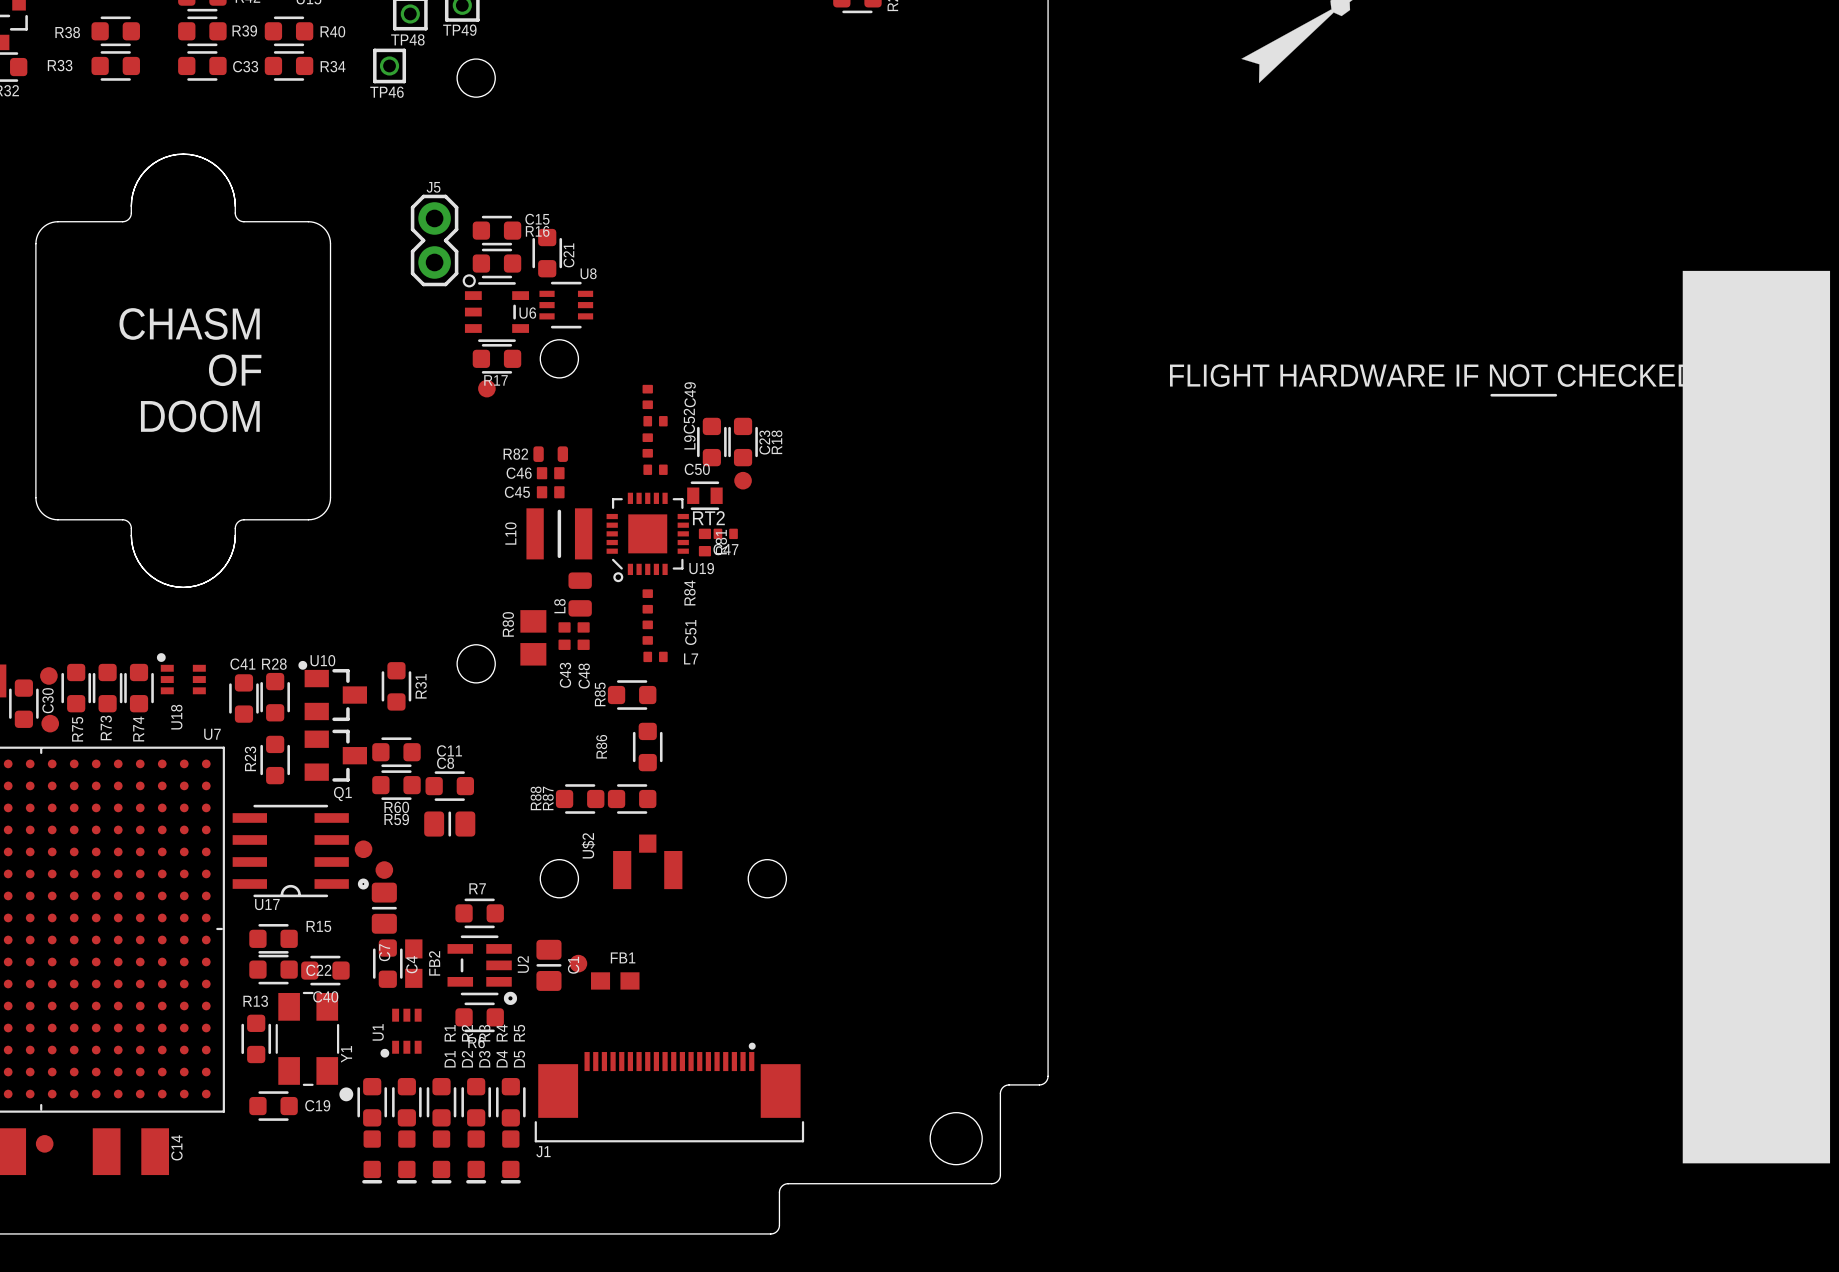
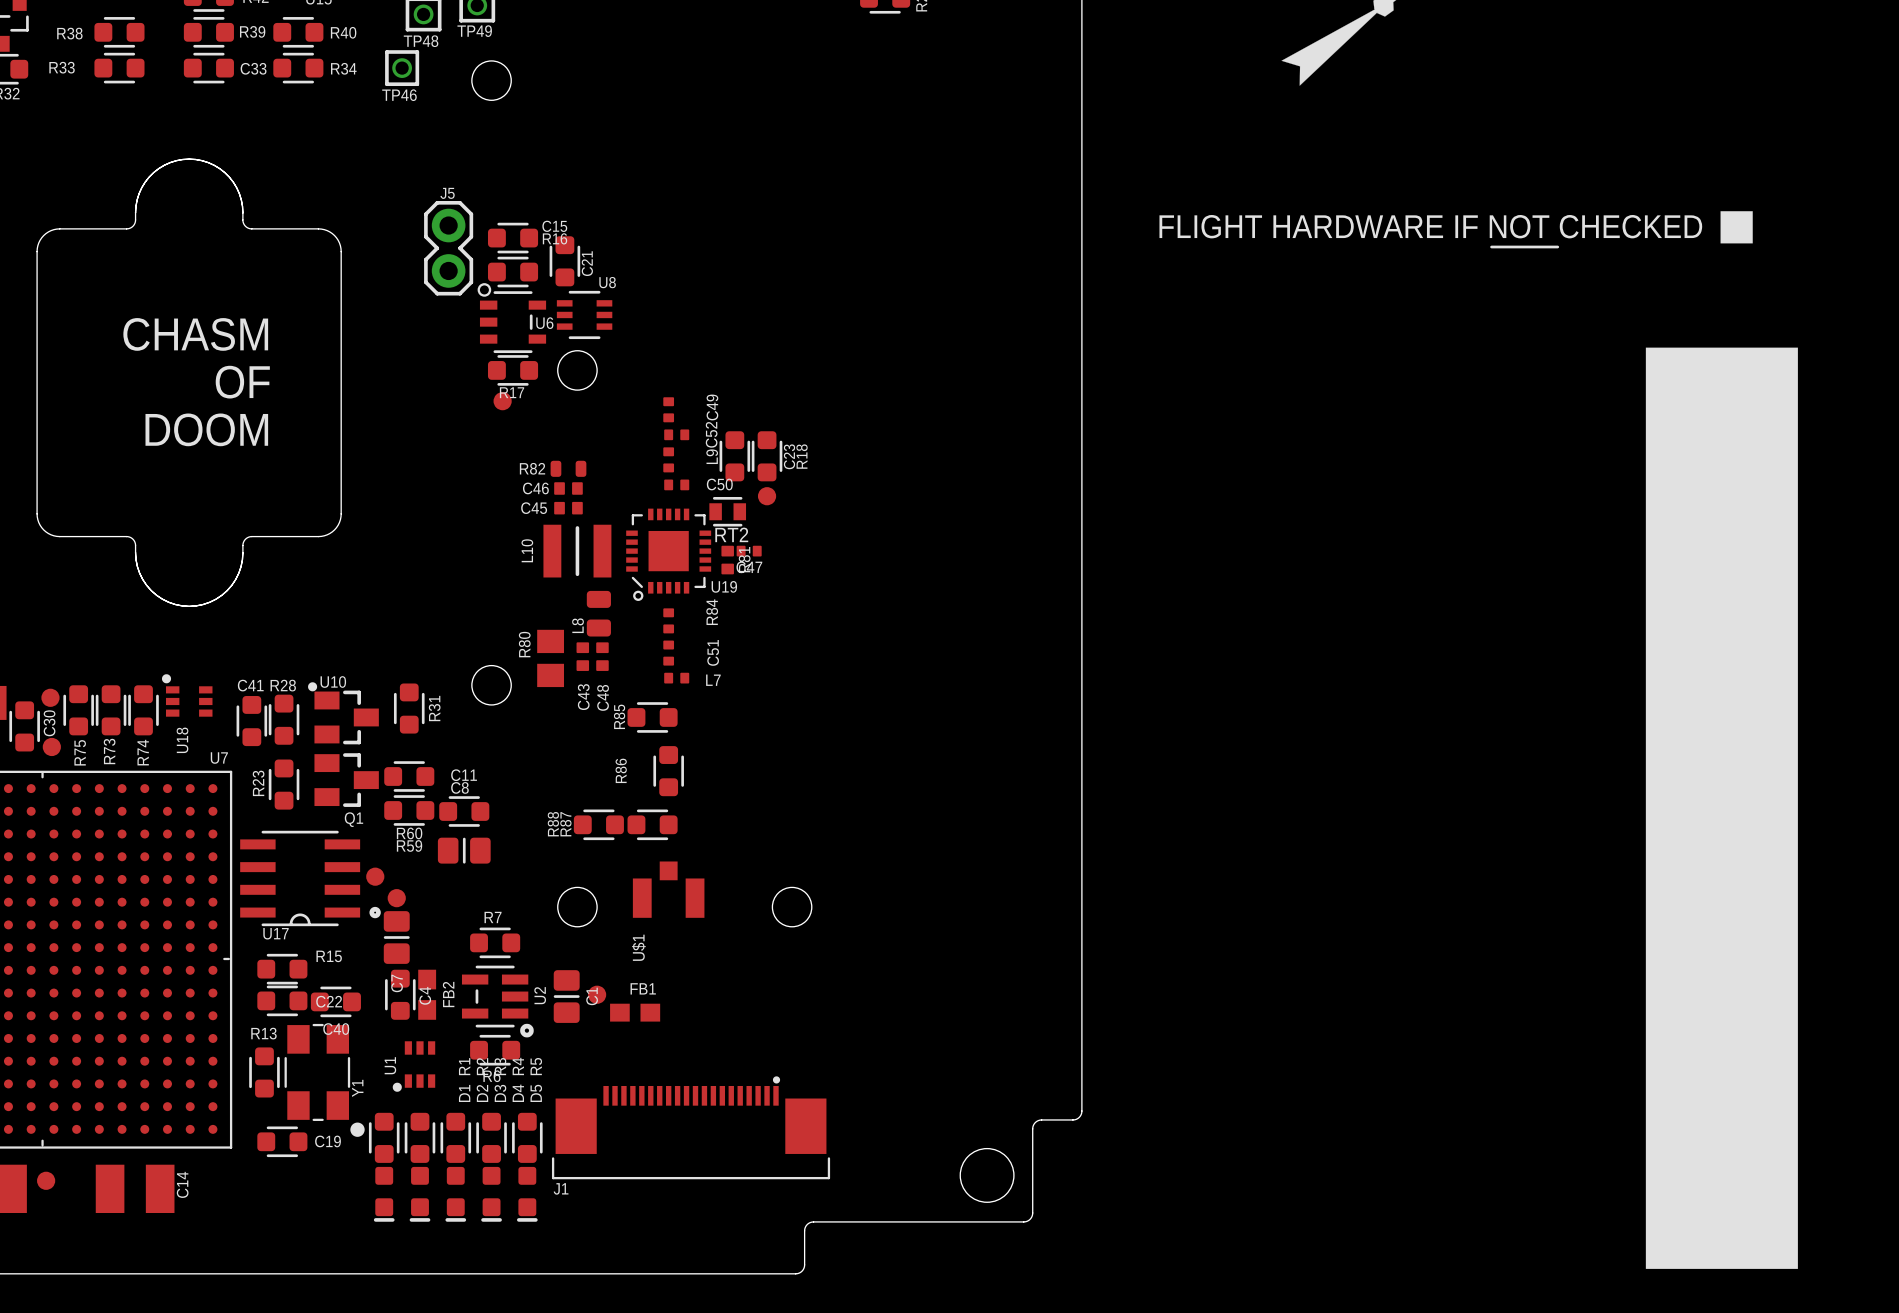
drawing position: (1617, 378) -> (1621, 229)
drawing position: (1756, 717) -> (1721, 808)
U$2 name: U$2 (588, 845) -> U$1 (638, 947)

